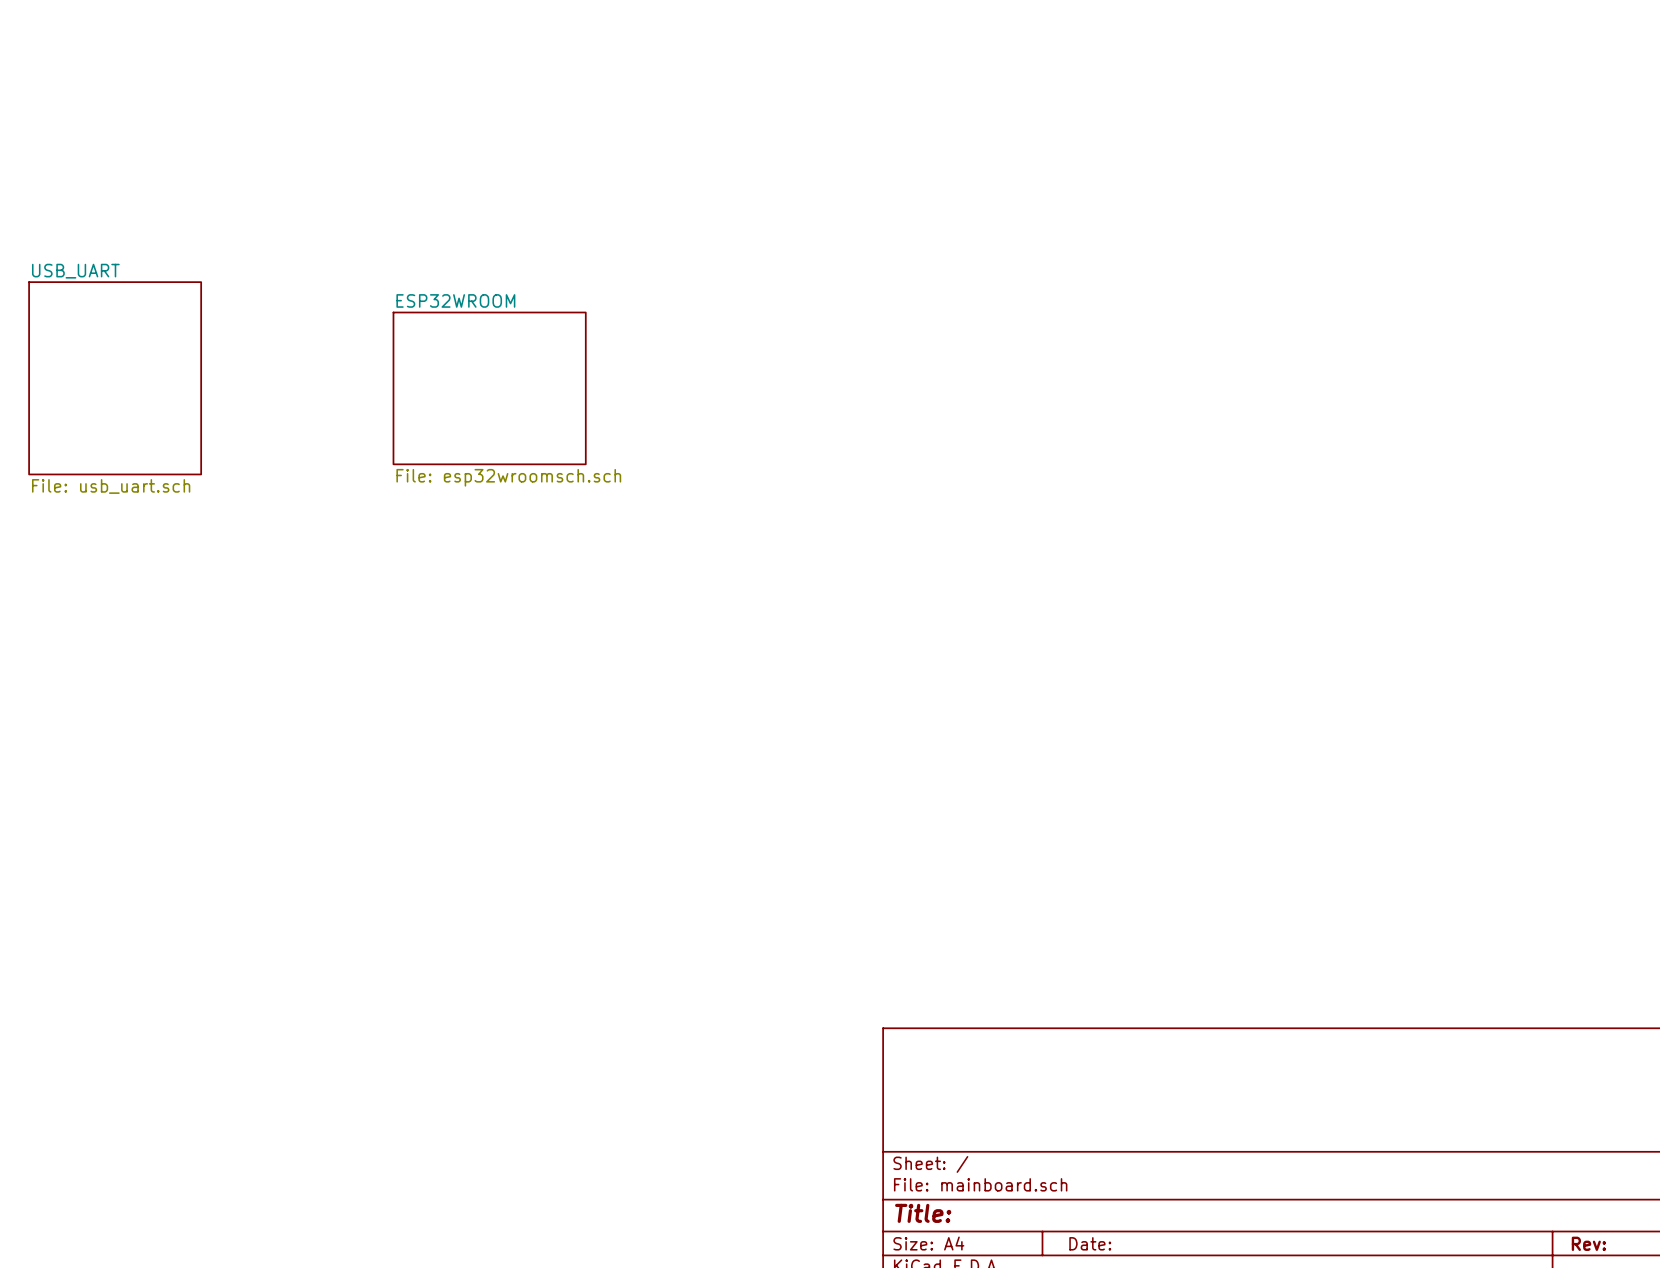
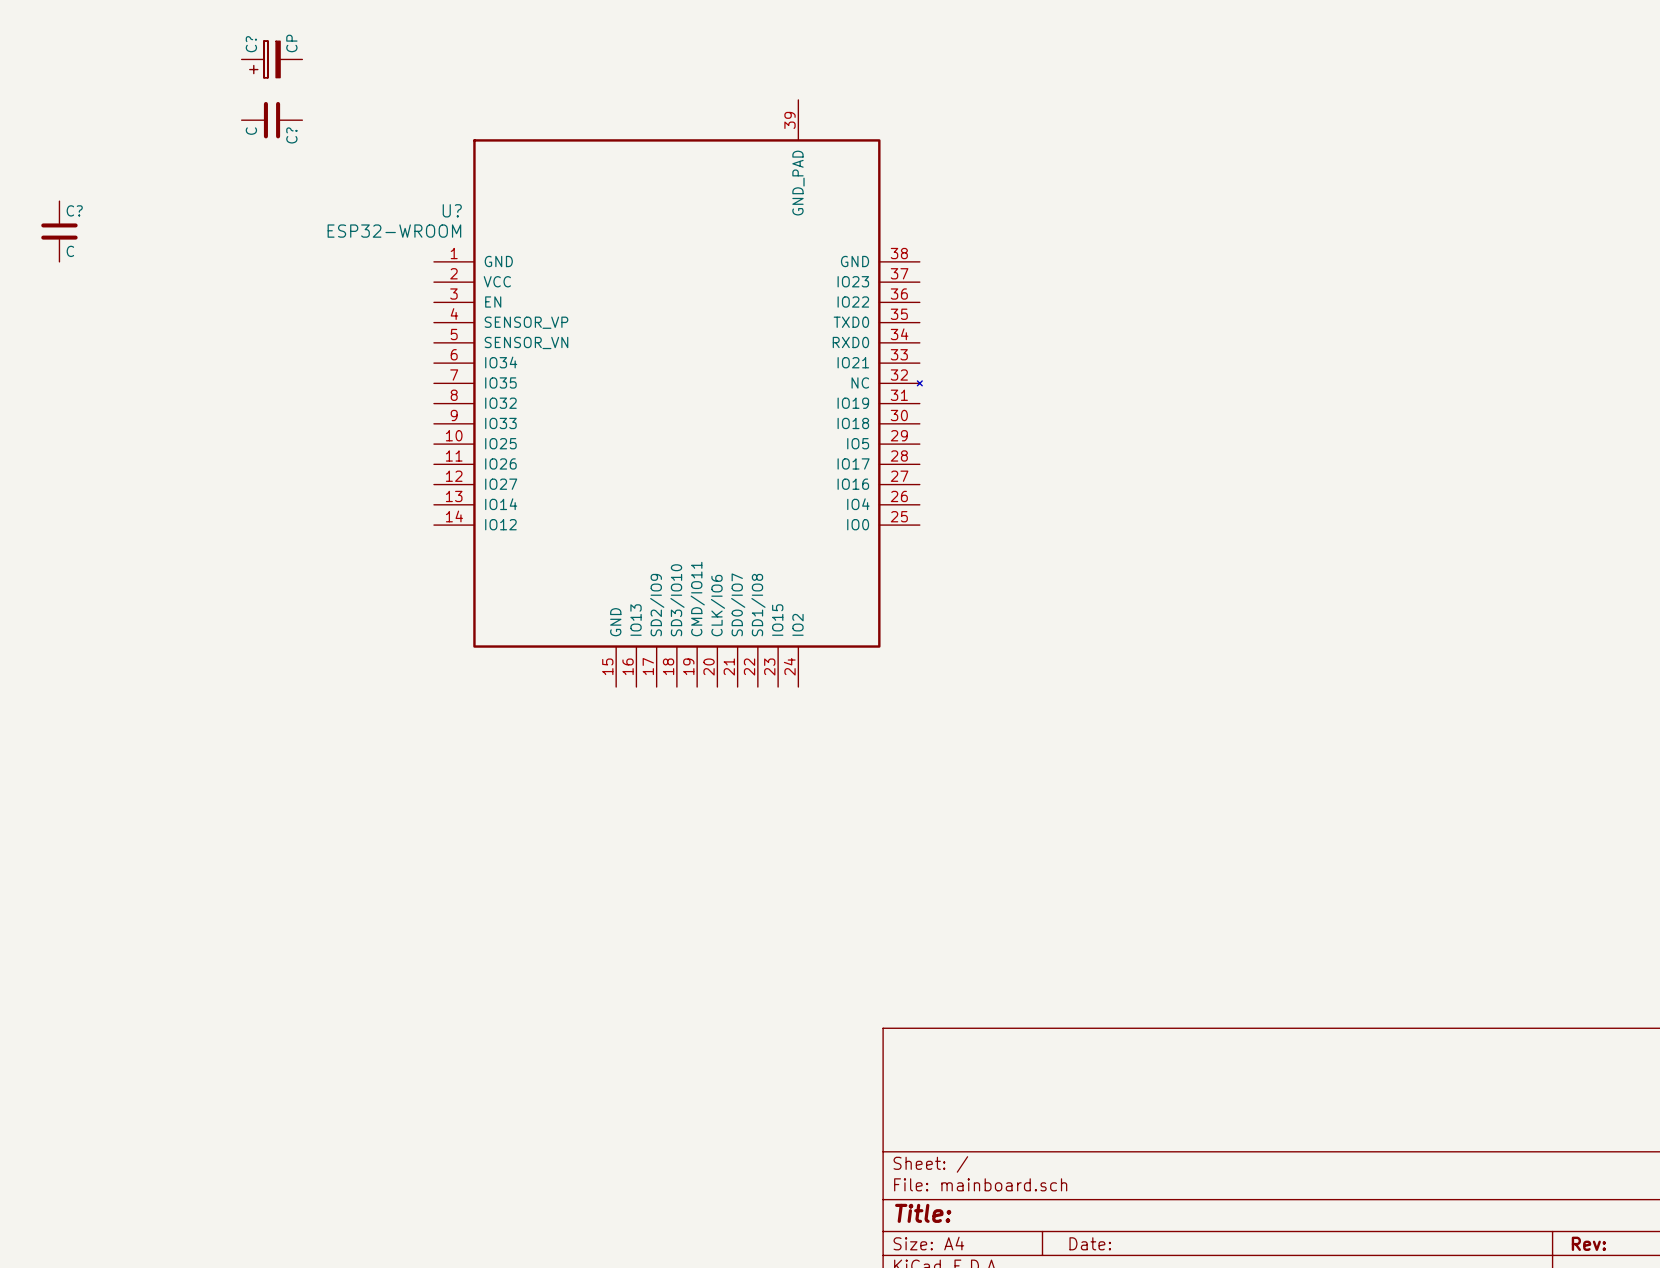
C?: none -> CP (272, 59)
C?: none -> C (272, 120)
C?: none -> C (59, 231)
sheet USB_UART: File: usb_uart.sch (115, 378) -> none
sheet ESP32WROOM: File: esp32wroomsch.sch (489, 388) -> none
U?: none -> ESP32-WROOM (678, 393)

